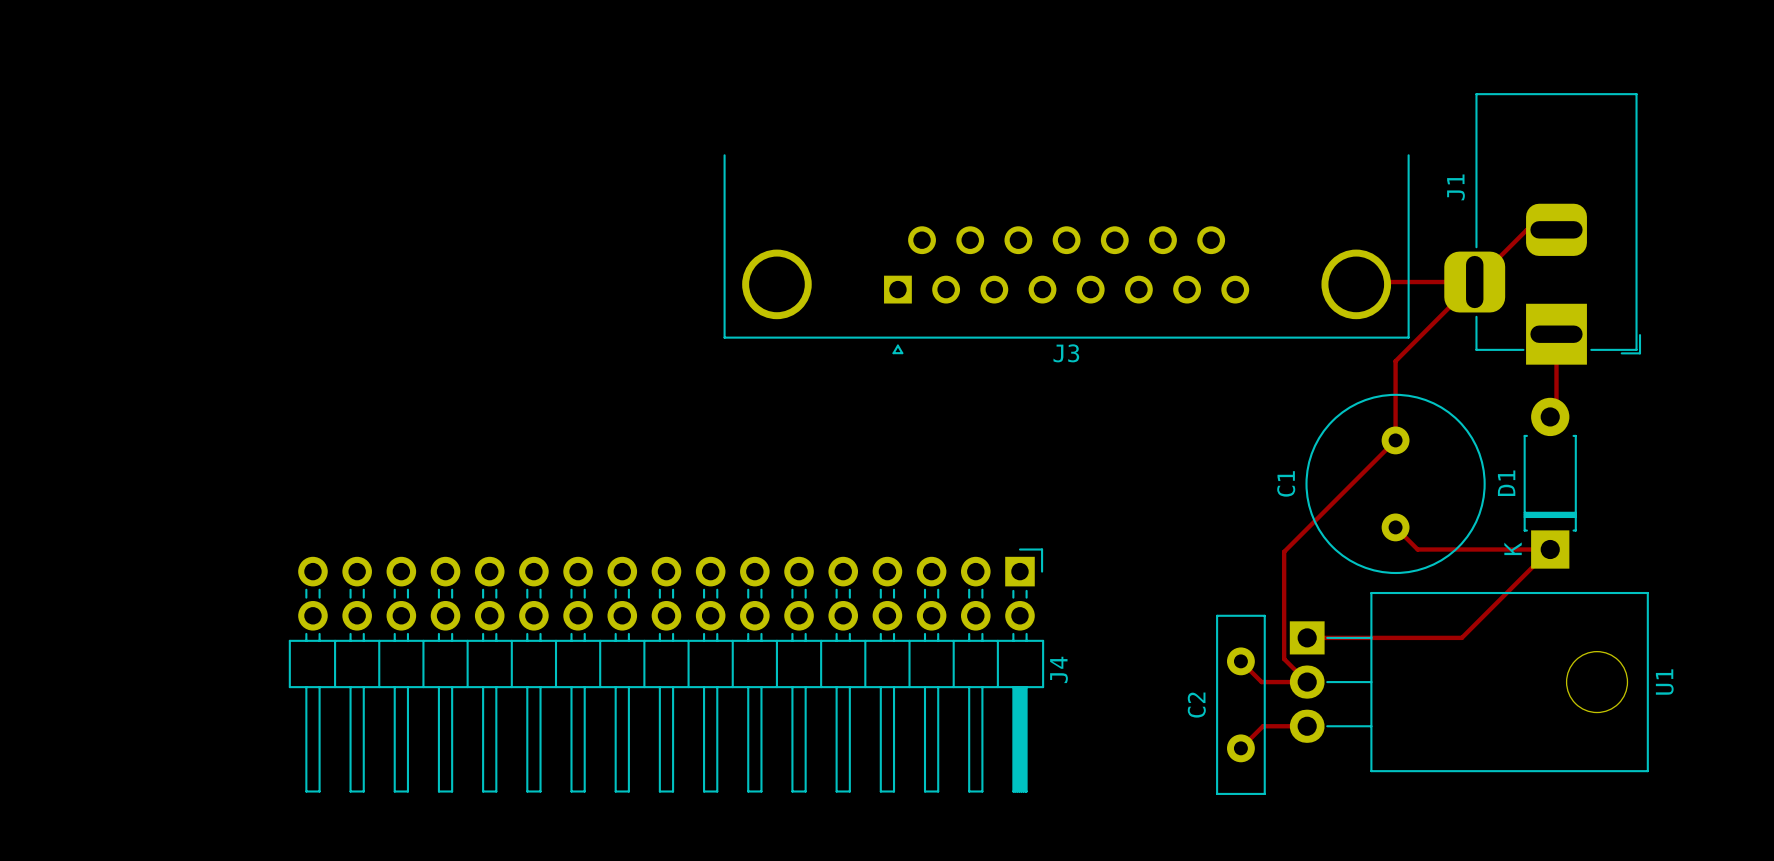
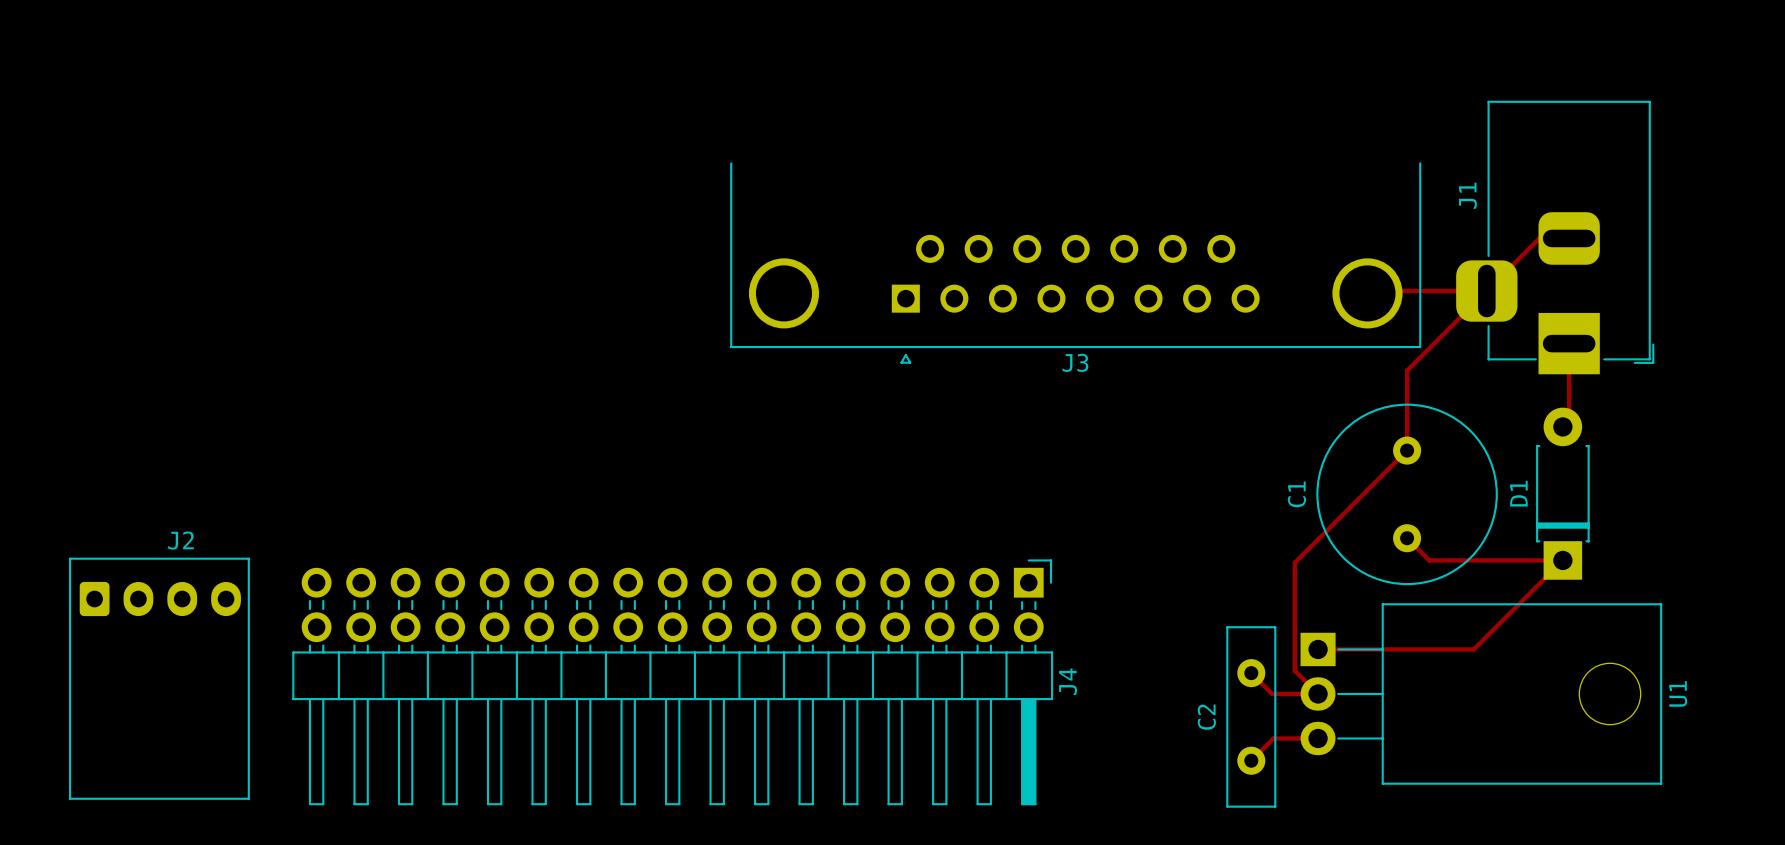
D1 text: K (1513, 548) -> none
J2: none -> (159, 678)

